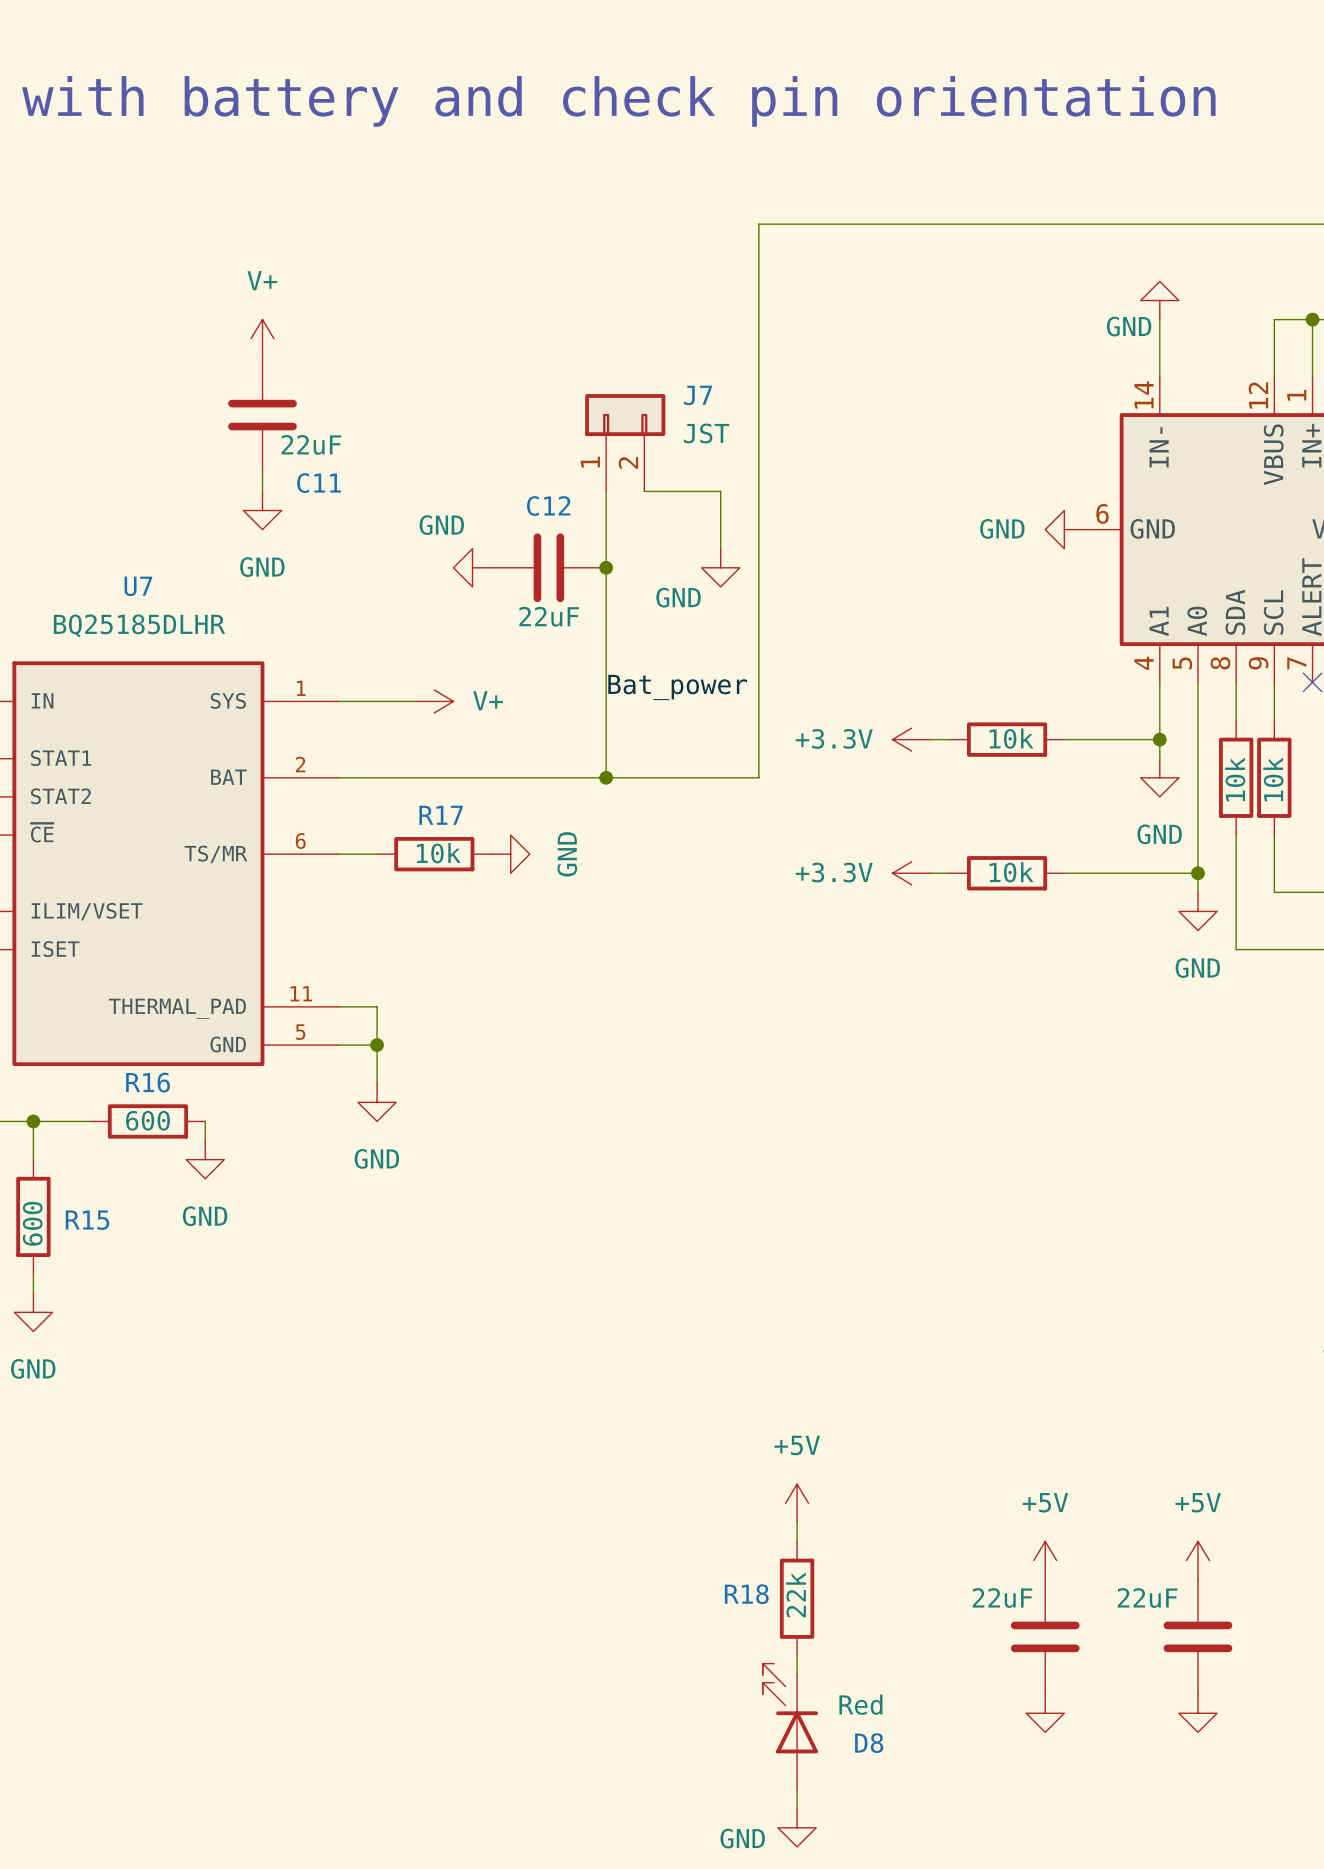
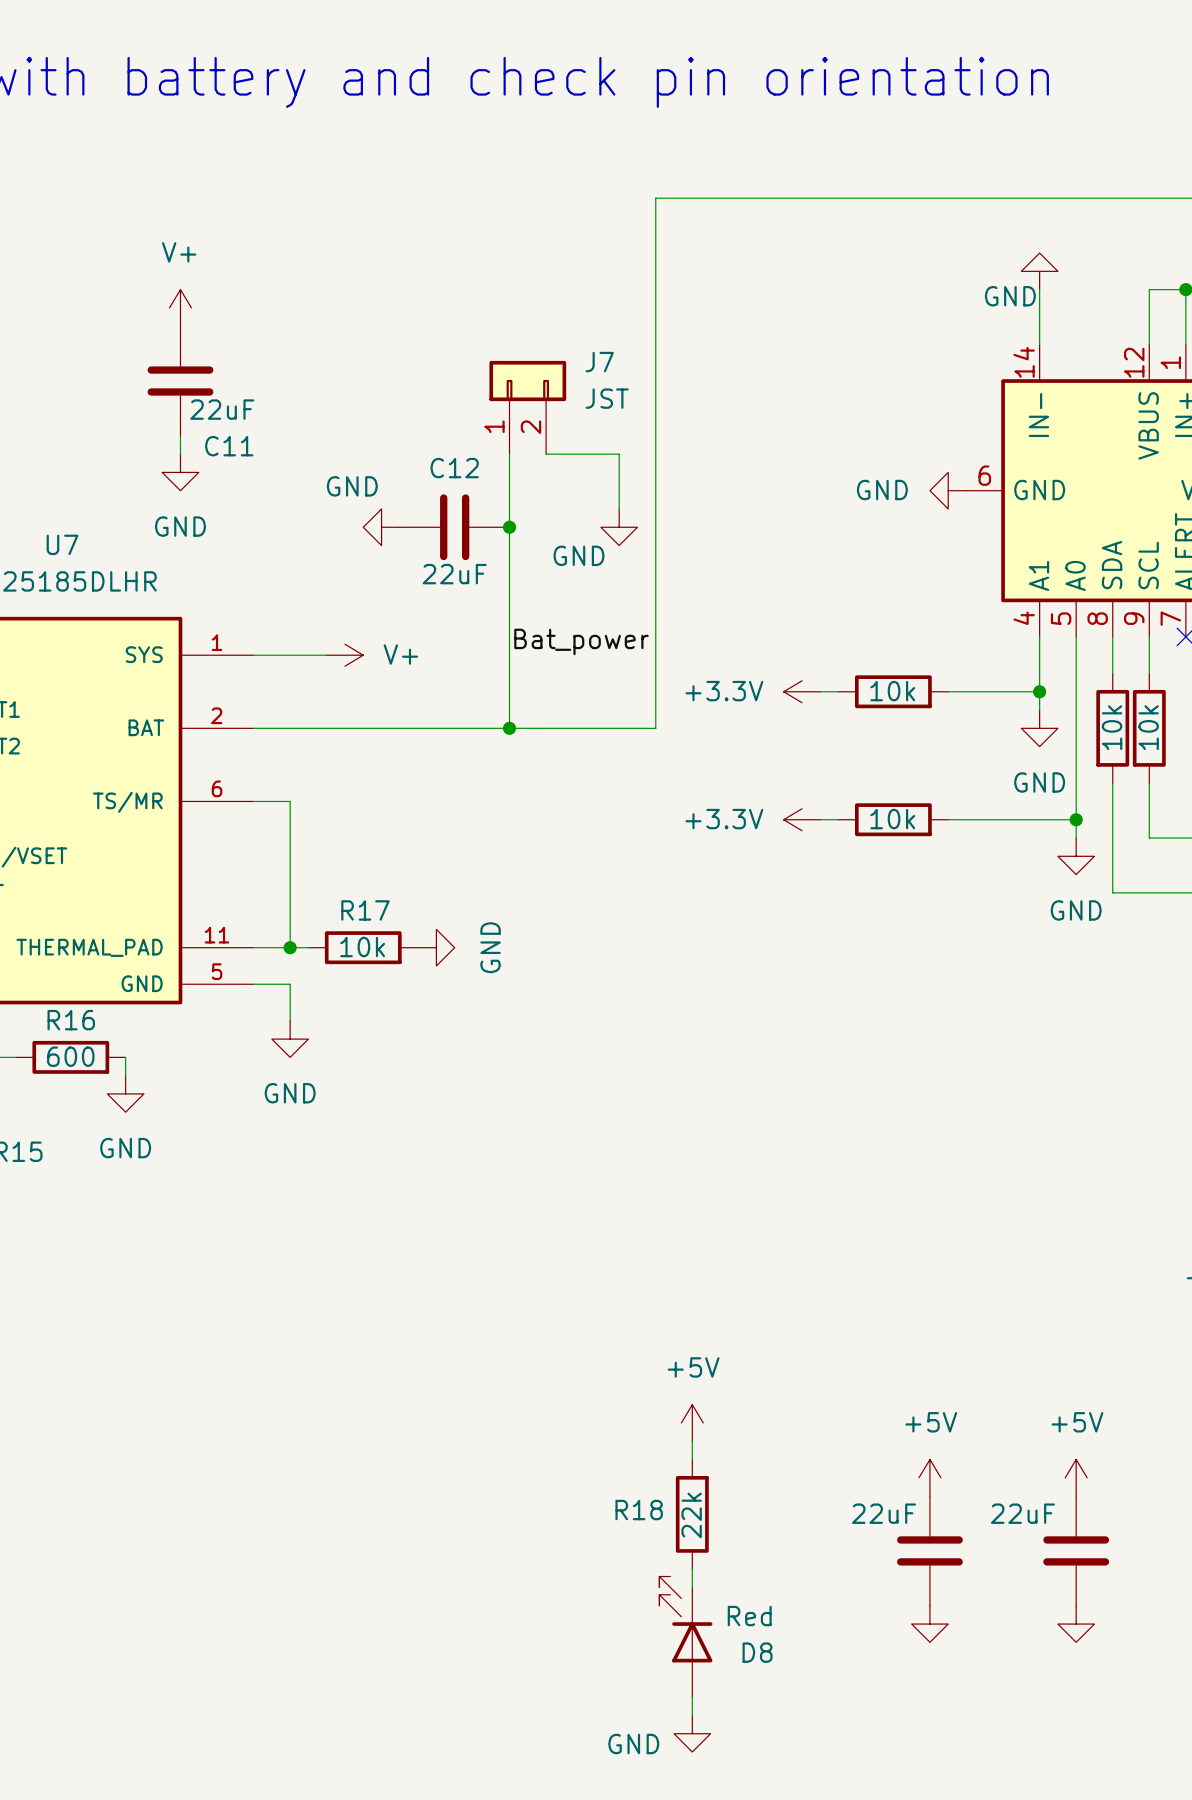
wire: none -> (290, 801) (290, 947) (308, 947)
R17 position: (434, 854) -> (363, 947)
power symbol position: GND (510, 854) -> GND (436, 947)
wire: (377, 1006) (377, 1045) -> none
junction position: (377, 1045) -> (290, 947)

